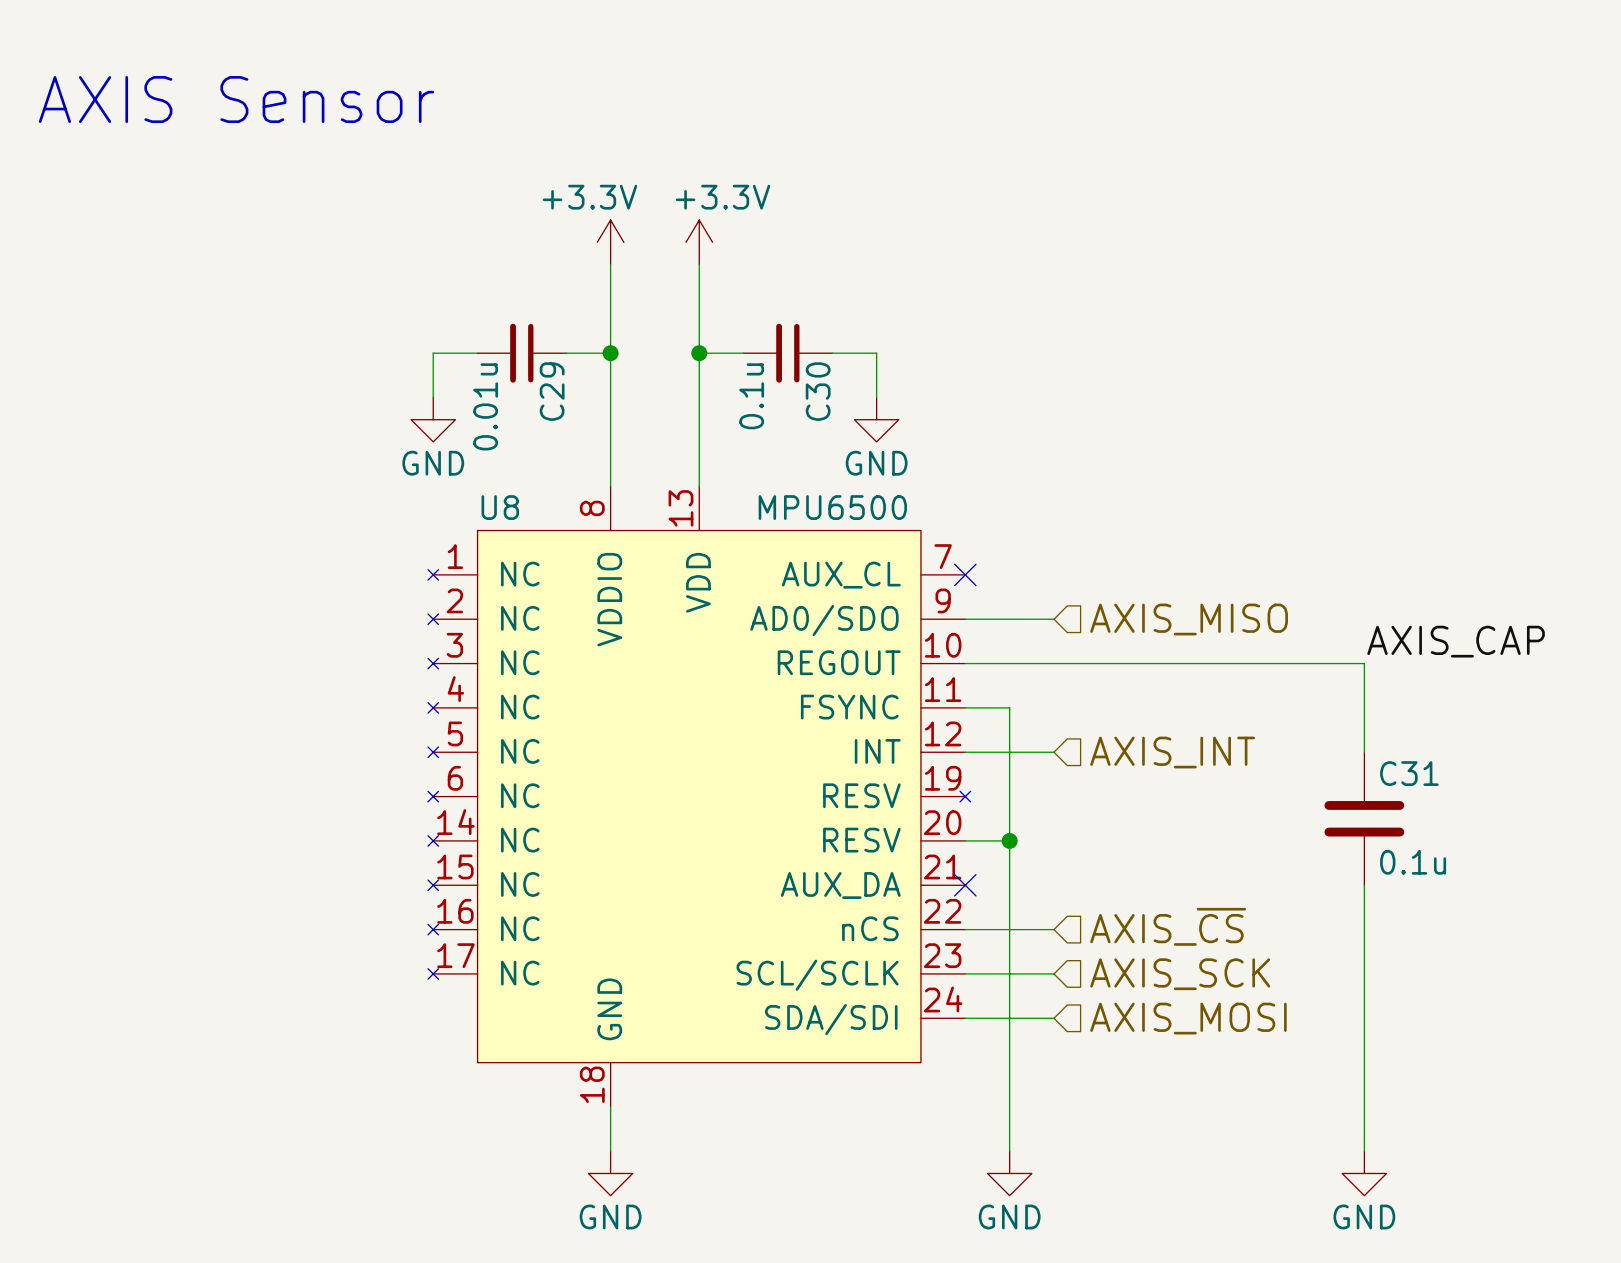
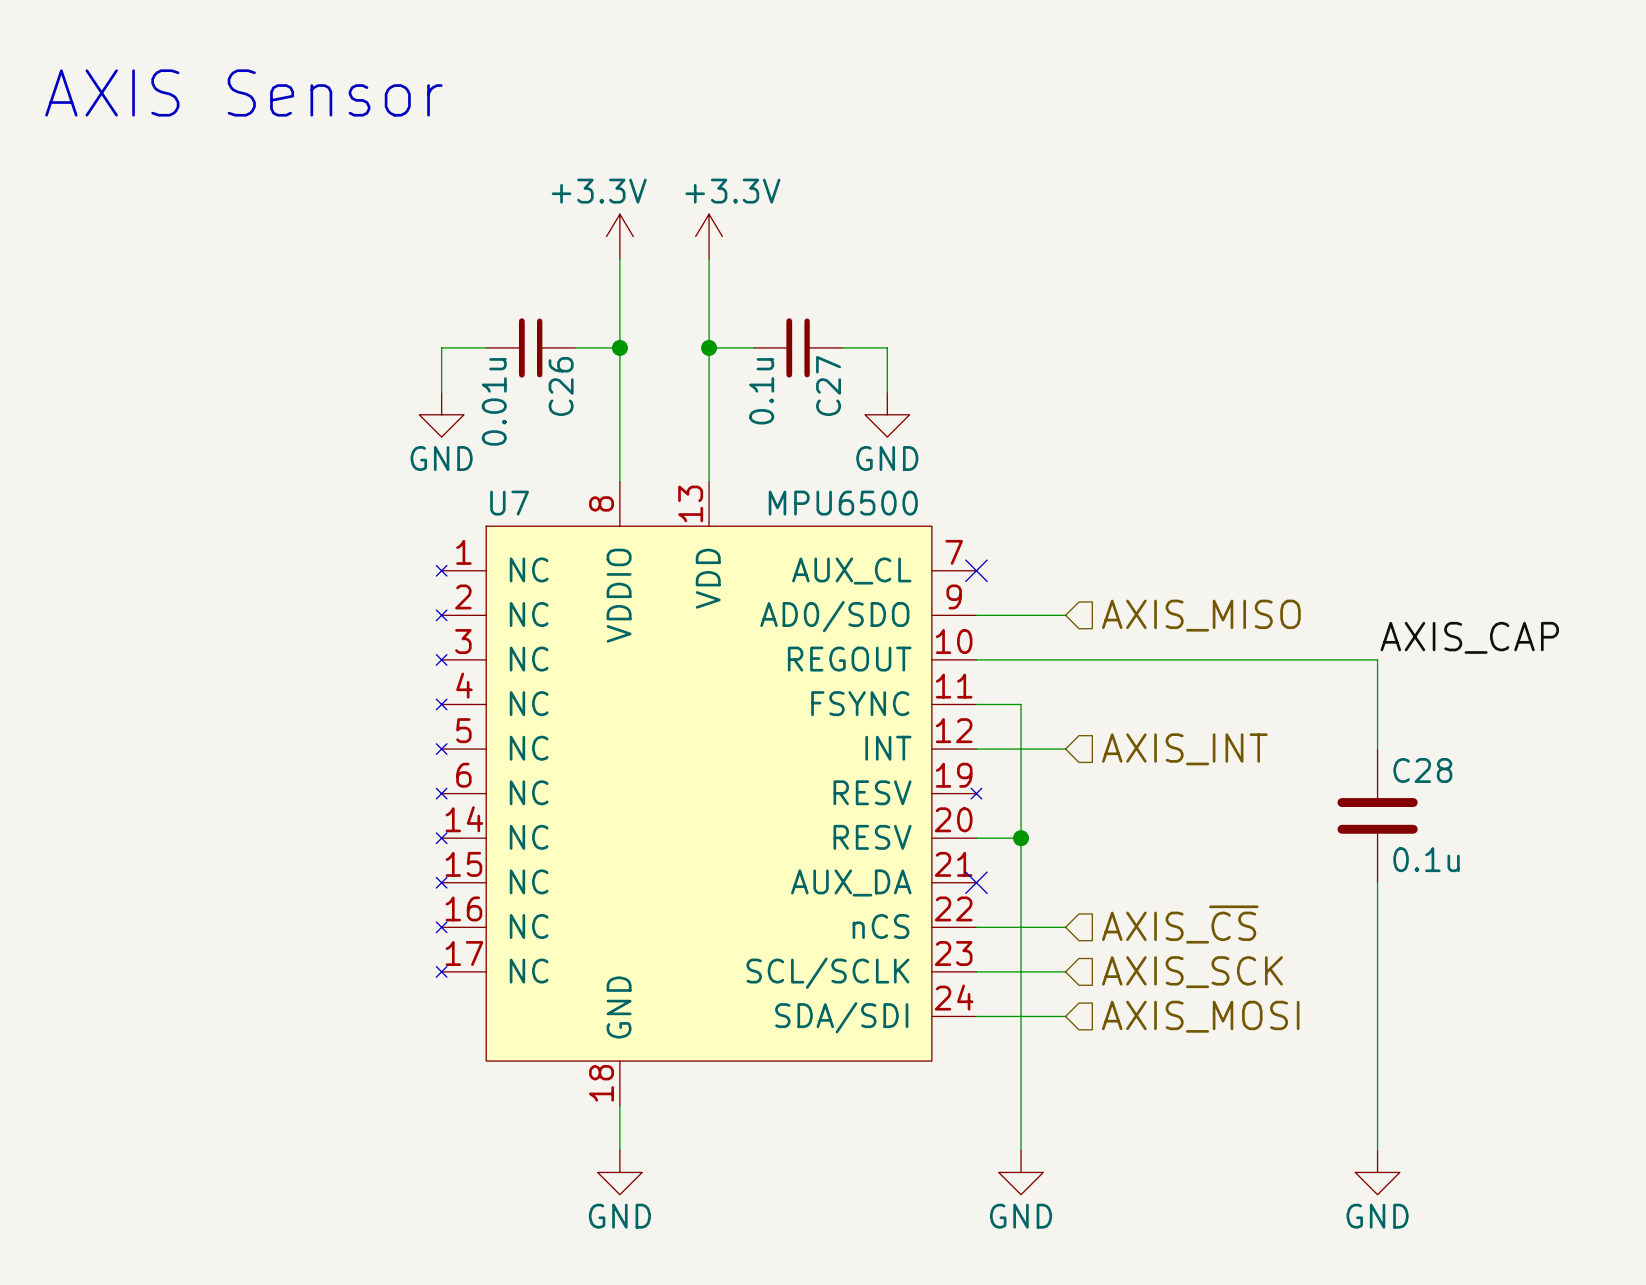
C29 name: C29 (552, 391) -> C26 (561, 386)
C30 name: C30 (818, 391) -> C27 (828, 385)
U8 name: U8 (500, 507) -> U7 (509, 503)
C31 name: C31 (1409, 773) -> C28 (1422, 770)

